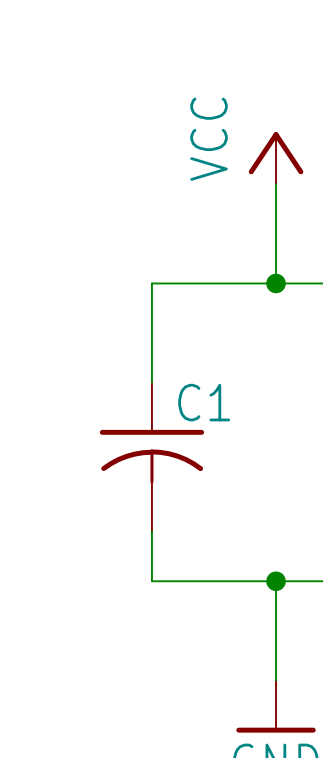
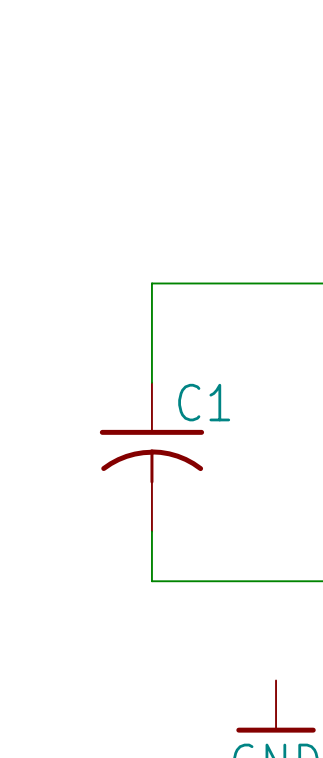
power symbol: VCC (276, 158) -> none
wire: (276, 184) (276, 283) -> none
junction: (276, 283) -> none
wire: (276, 581) (276, 680) -> none
junction: (276, 581) -> none

